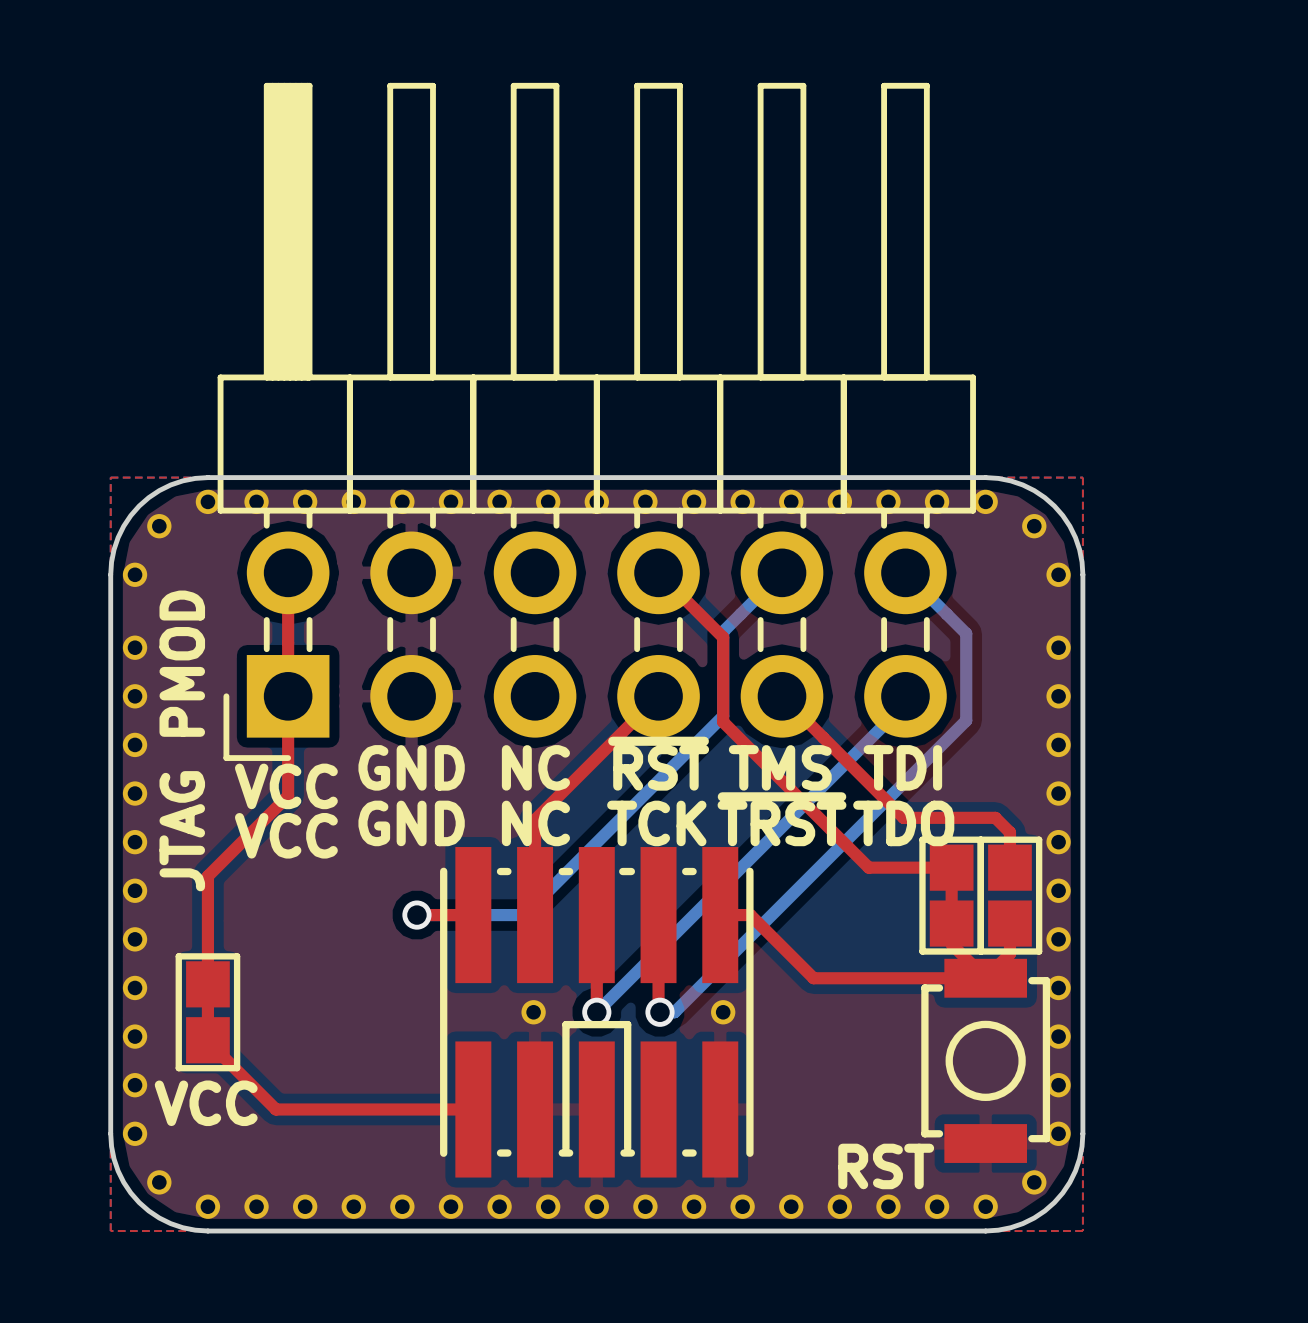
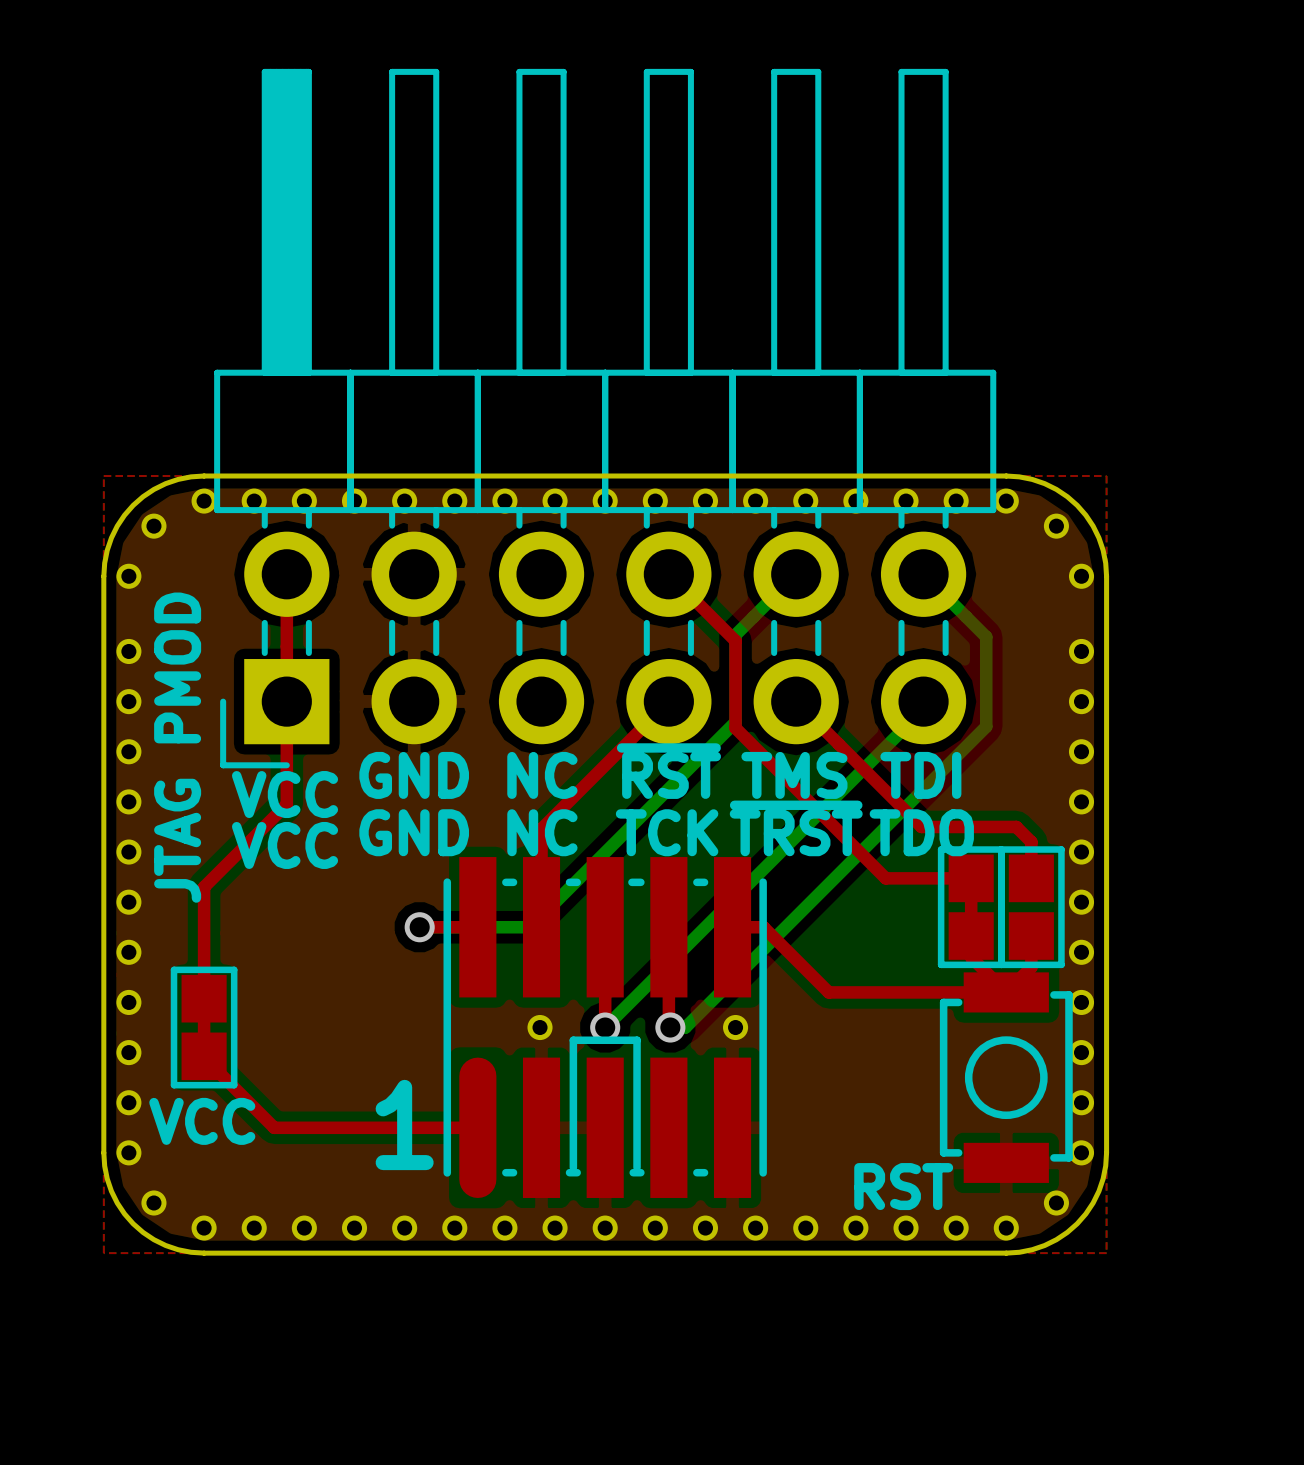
part footprint: [440, 847, 754, 1178] -> [443, 857, 767, 1198]
text: none -> 1 (404, 1124)

